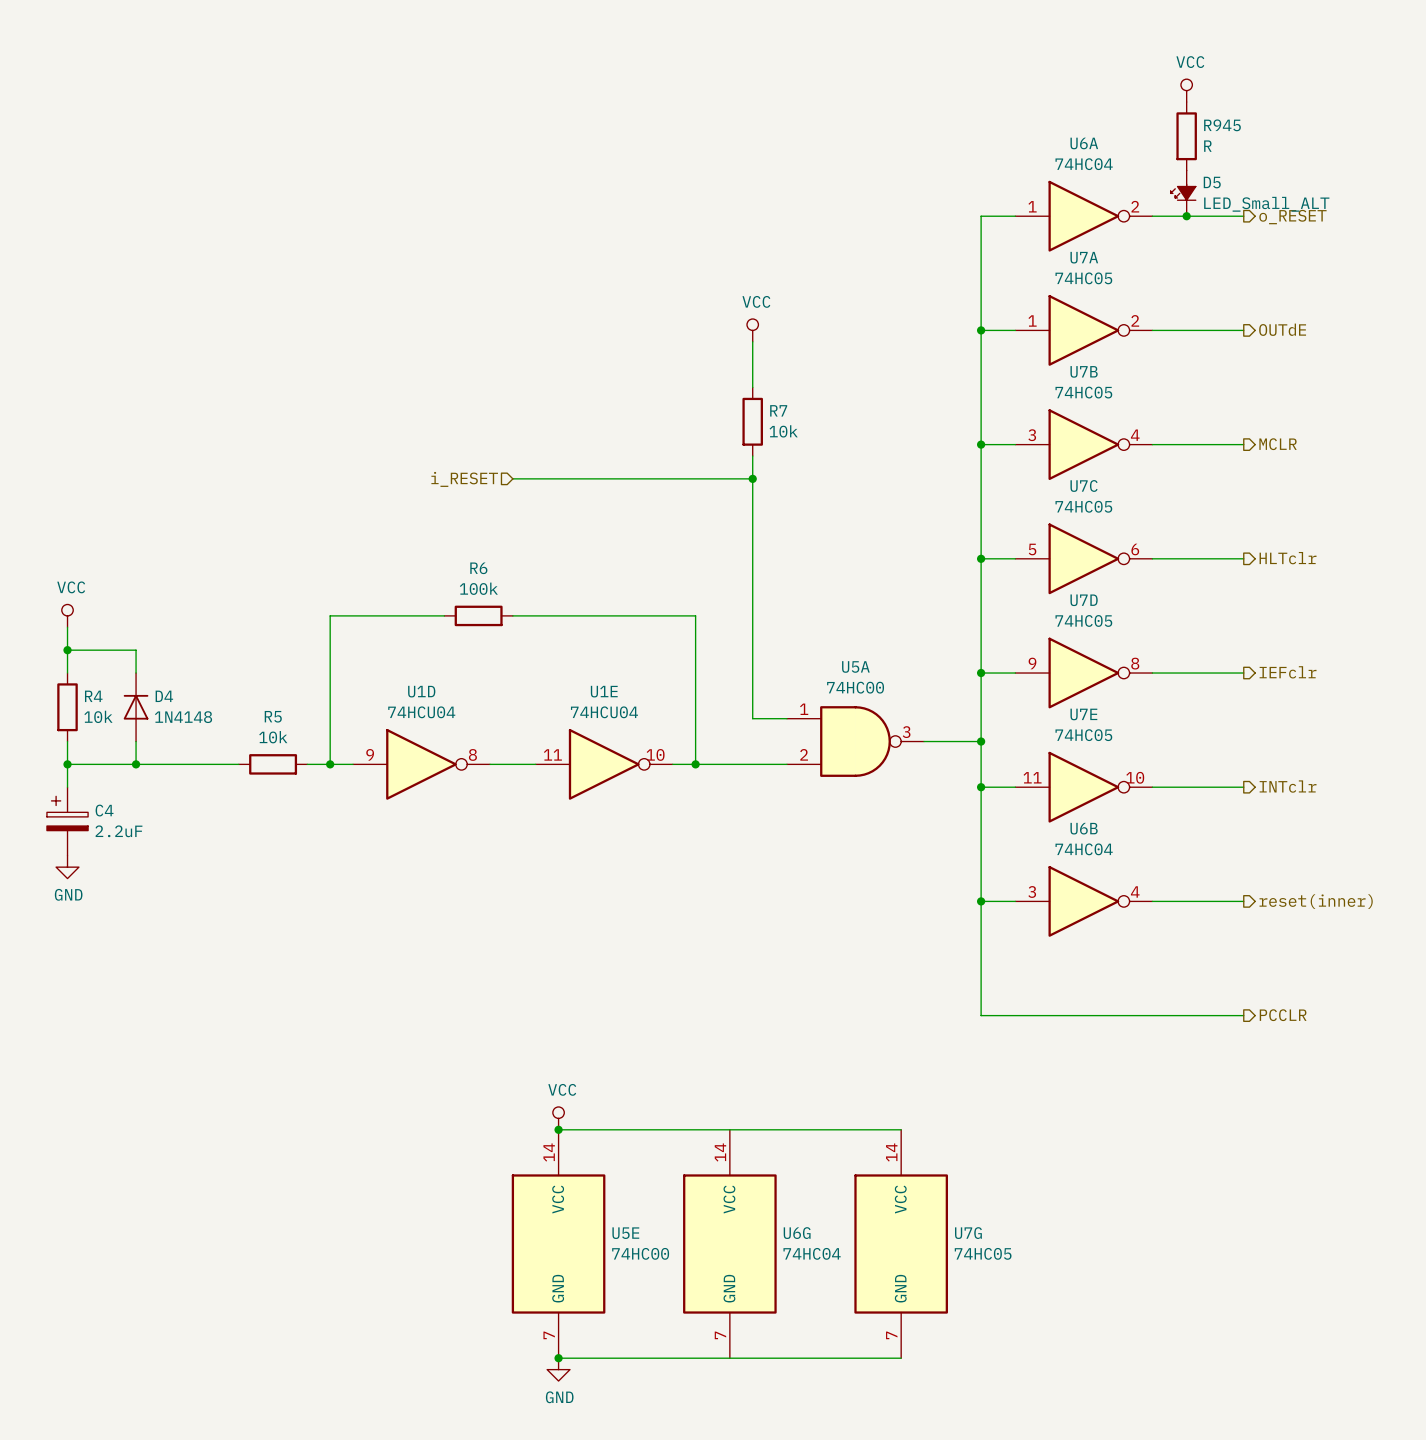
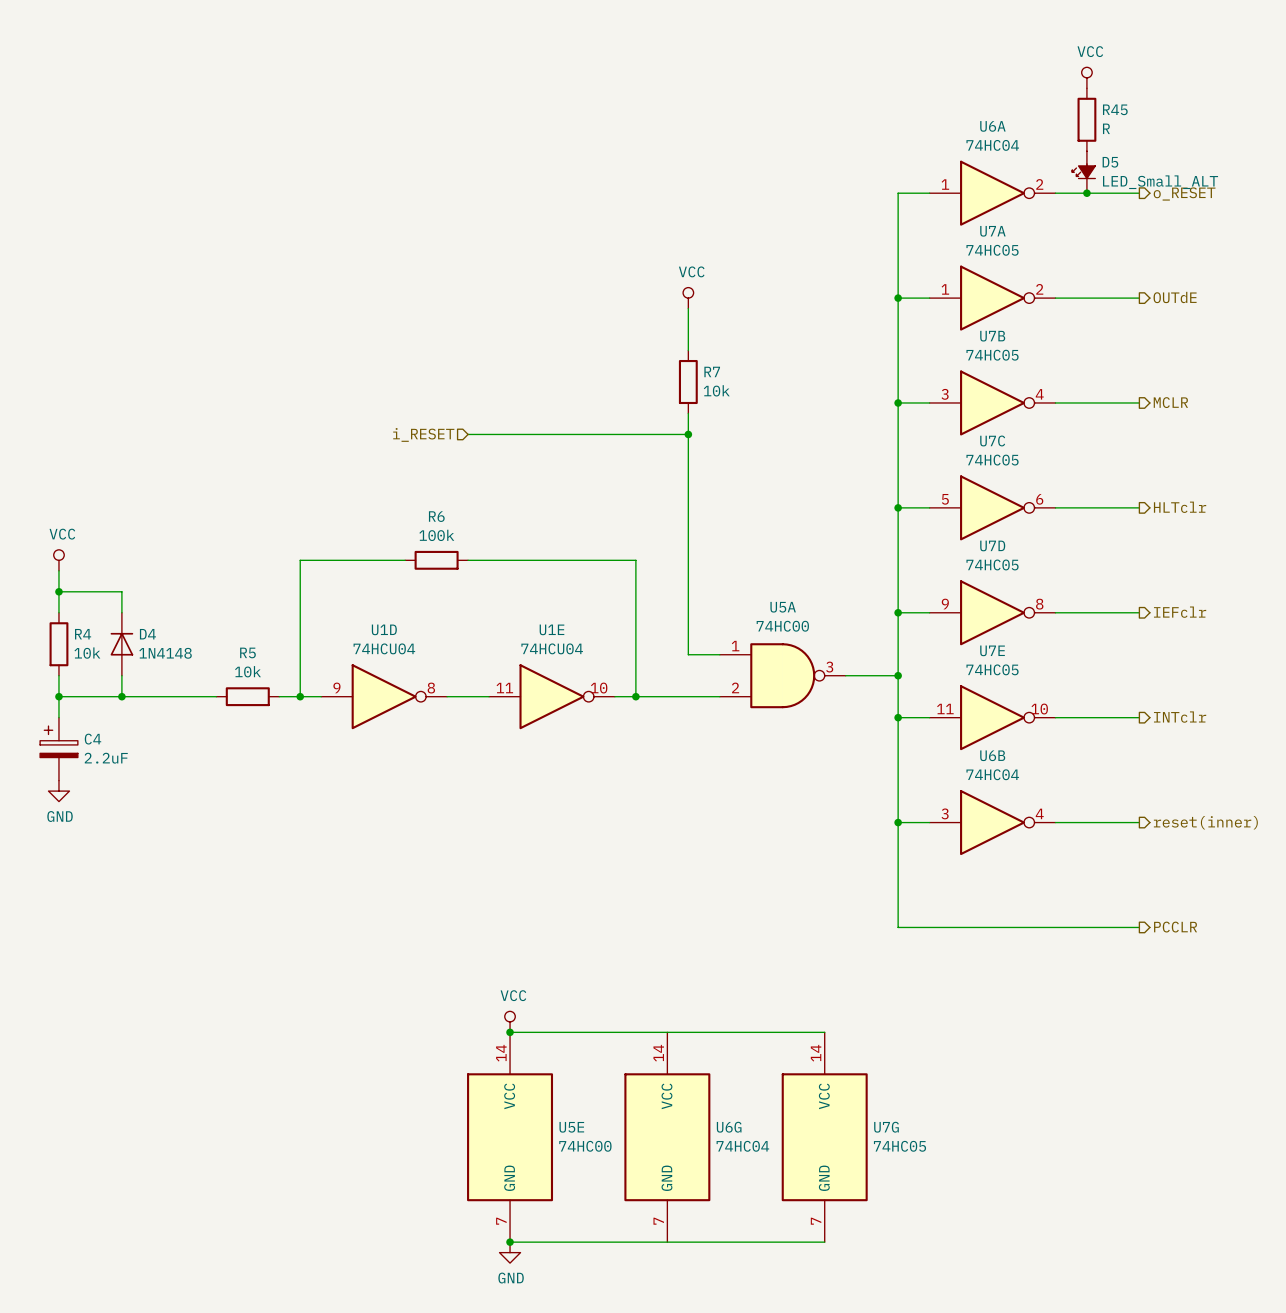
R945 name: R945 (1222, 125) -> R45 (1115, 109)

